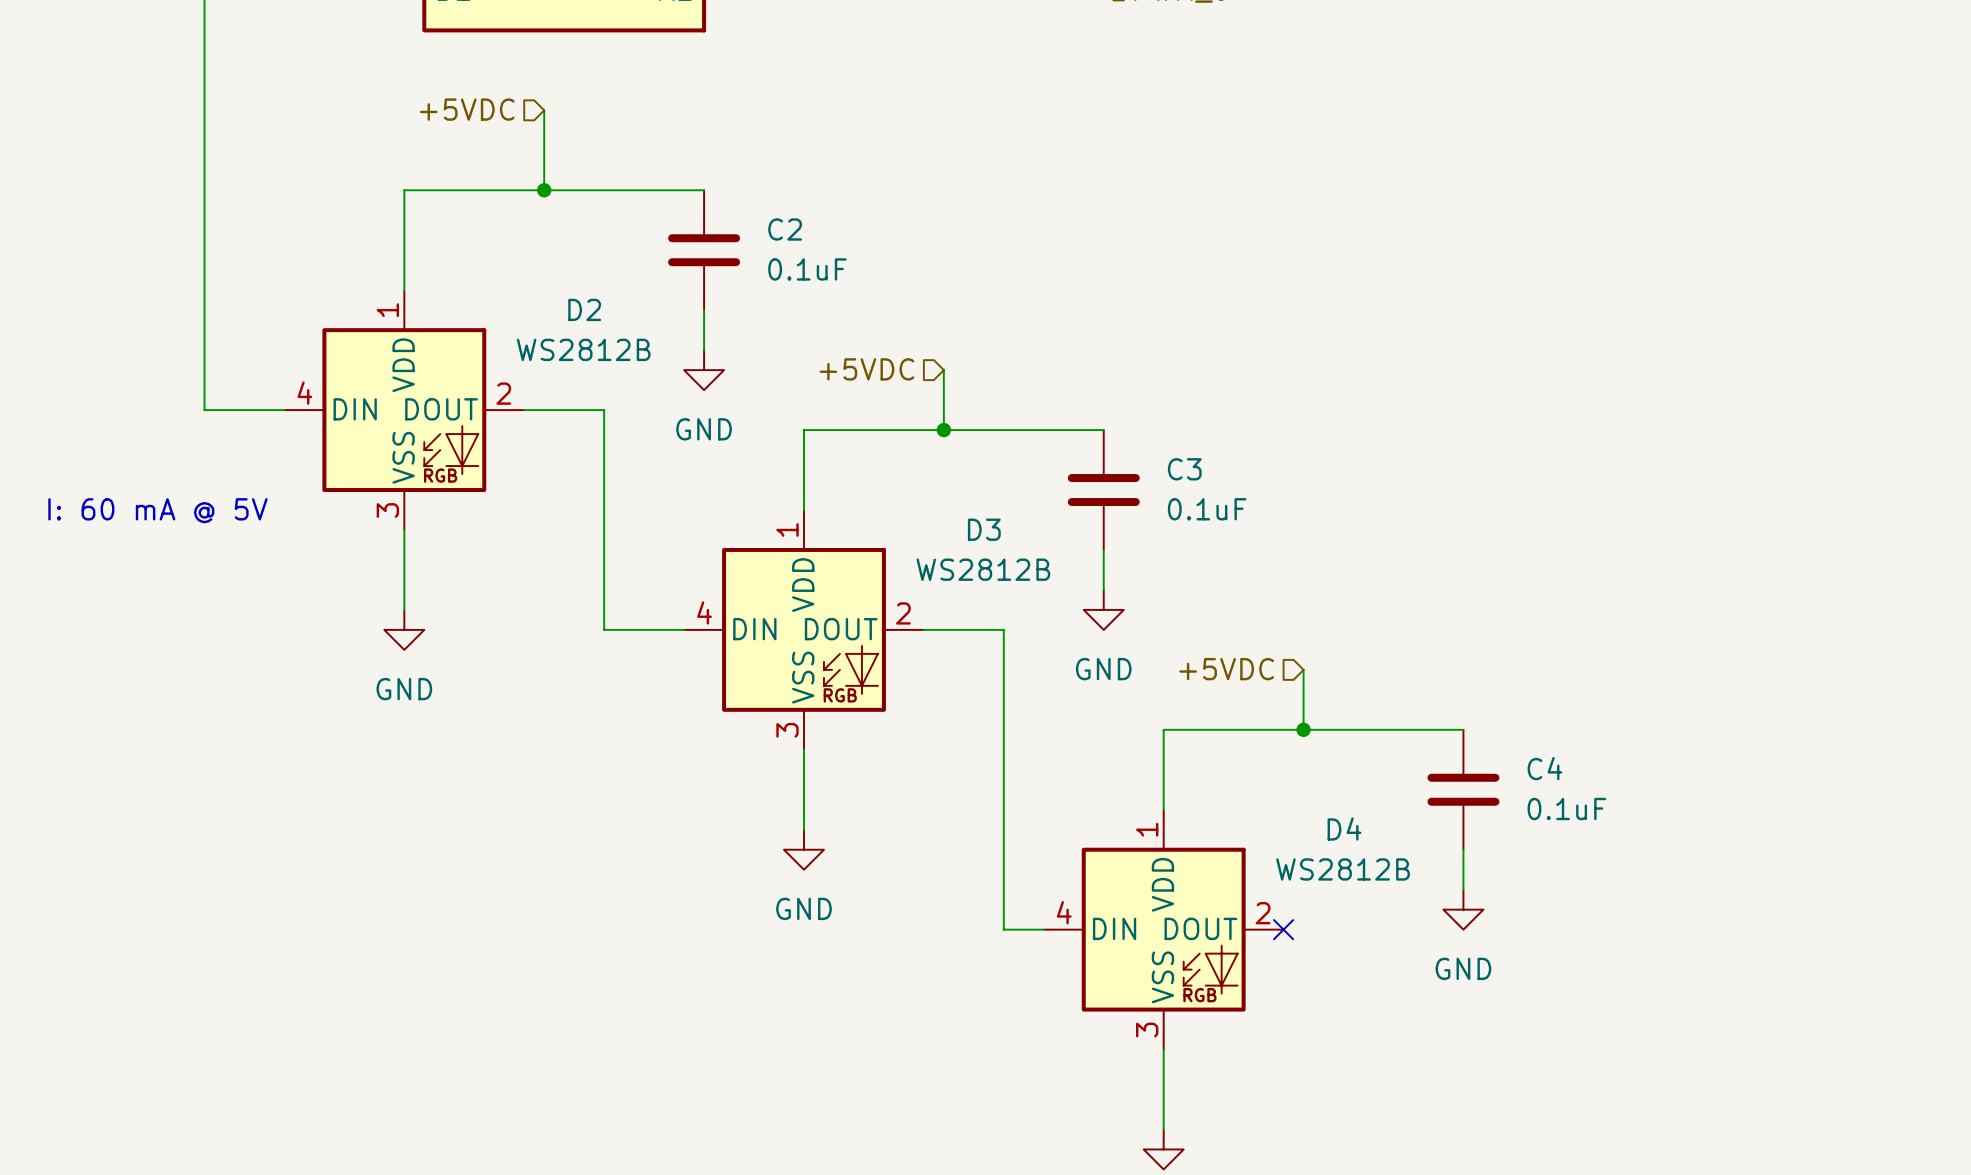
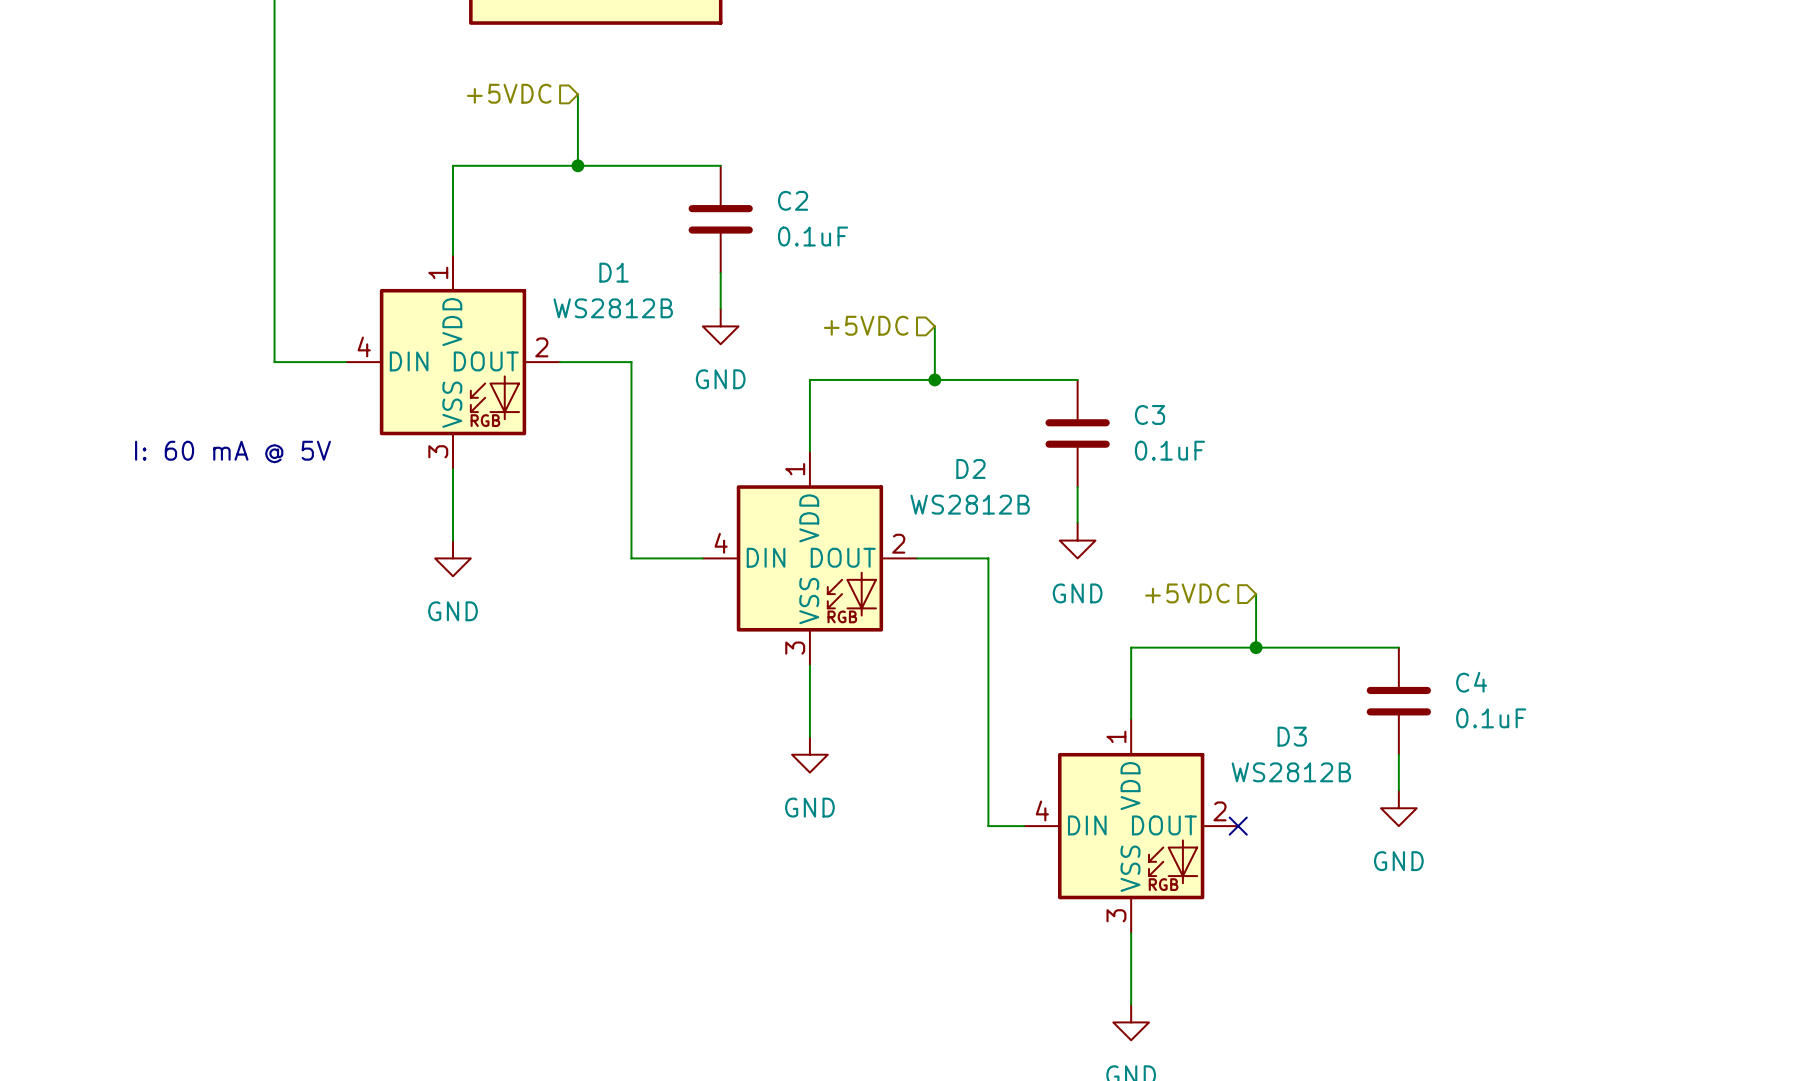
D2 name: D2 (584, 309) -> D1 (614, 272)
D3 name: D3 (984, 529) -> D2 (970, 468)
D4 name: D4 (1344, 829) -> D3 (1292, 736)

